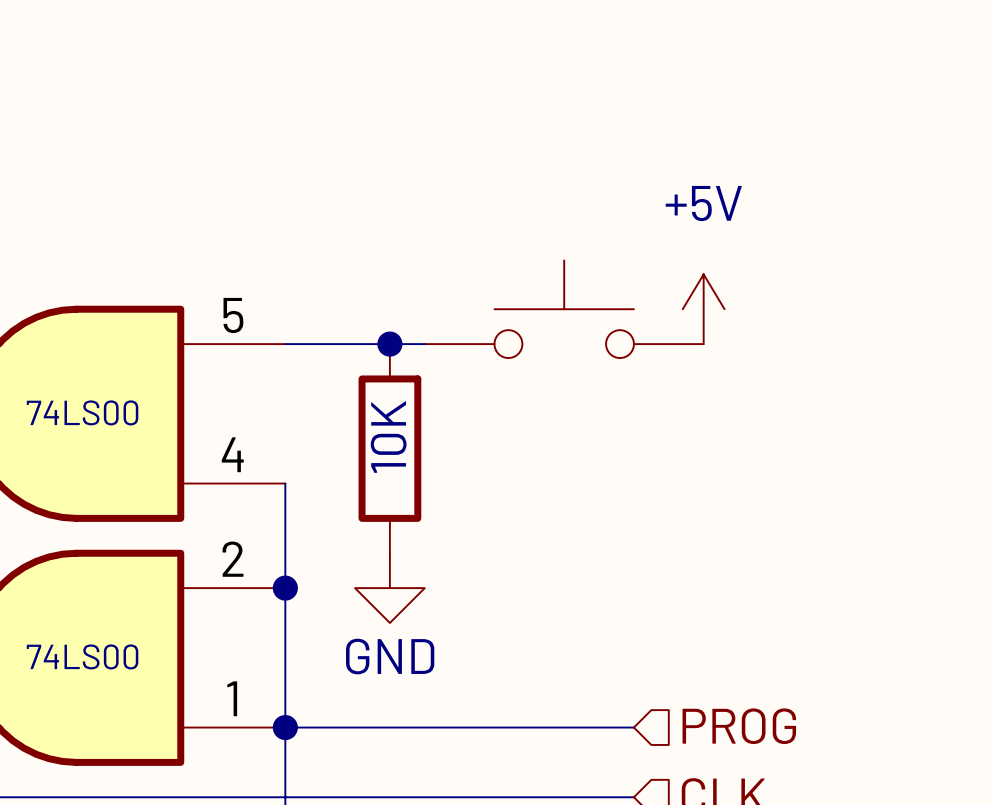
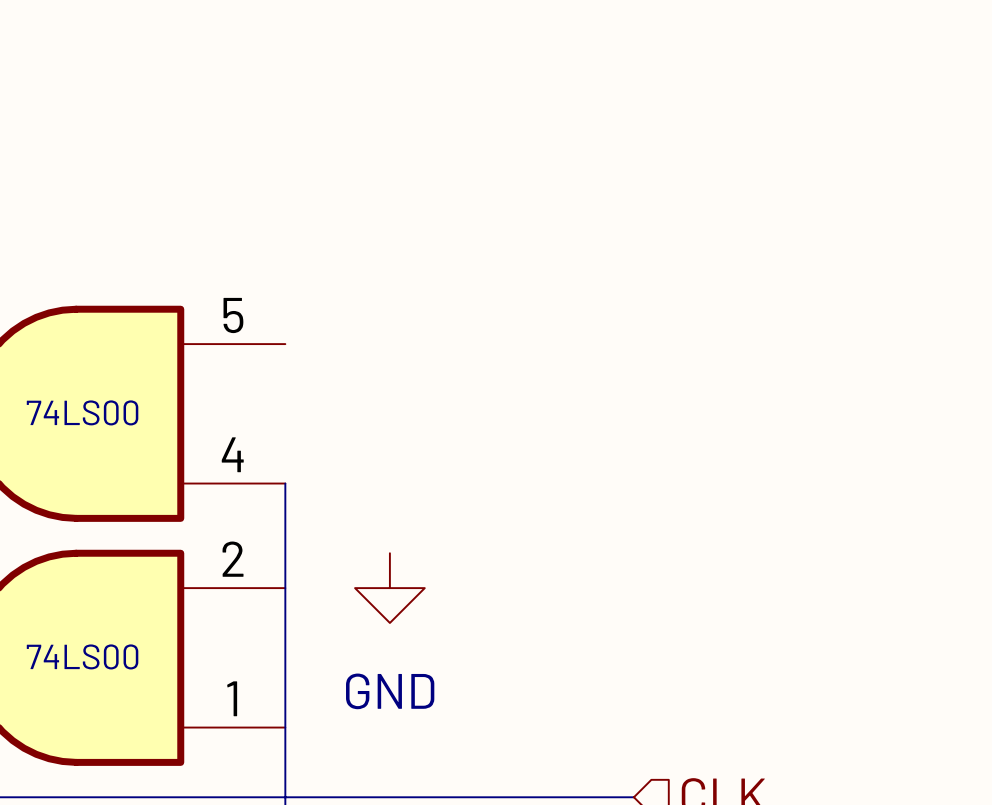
part: (564, 309) -> none
power symbol: +5V (703, 309) -> none
wire: (285, 344) (424, 344) -> none
junction: (389, 344) -> none
part: 10K (389, 448) -> none
junction: (285, 588) -> none
power symbol text position: GND (390, 656) -> GND (390, 691)
hierarchical label: PROG (739, 726) -> none
wire: (285, 727) (633, 727) -> none
junction: (285, 727) -> none

